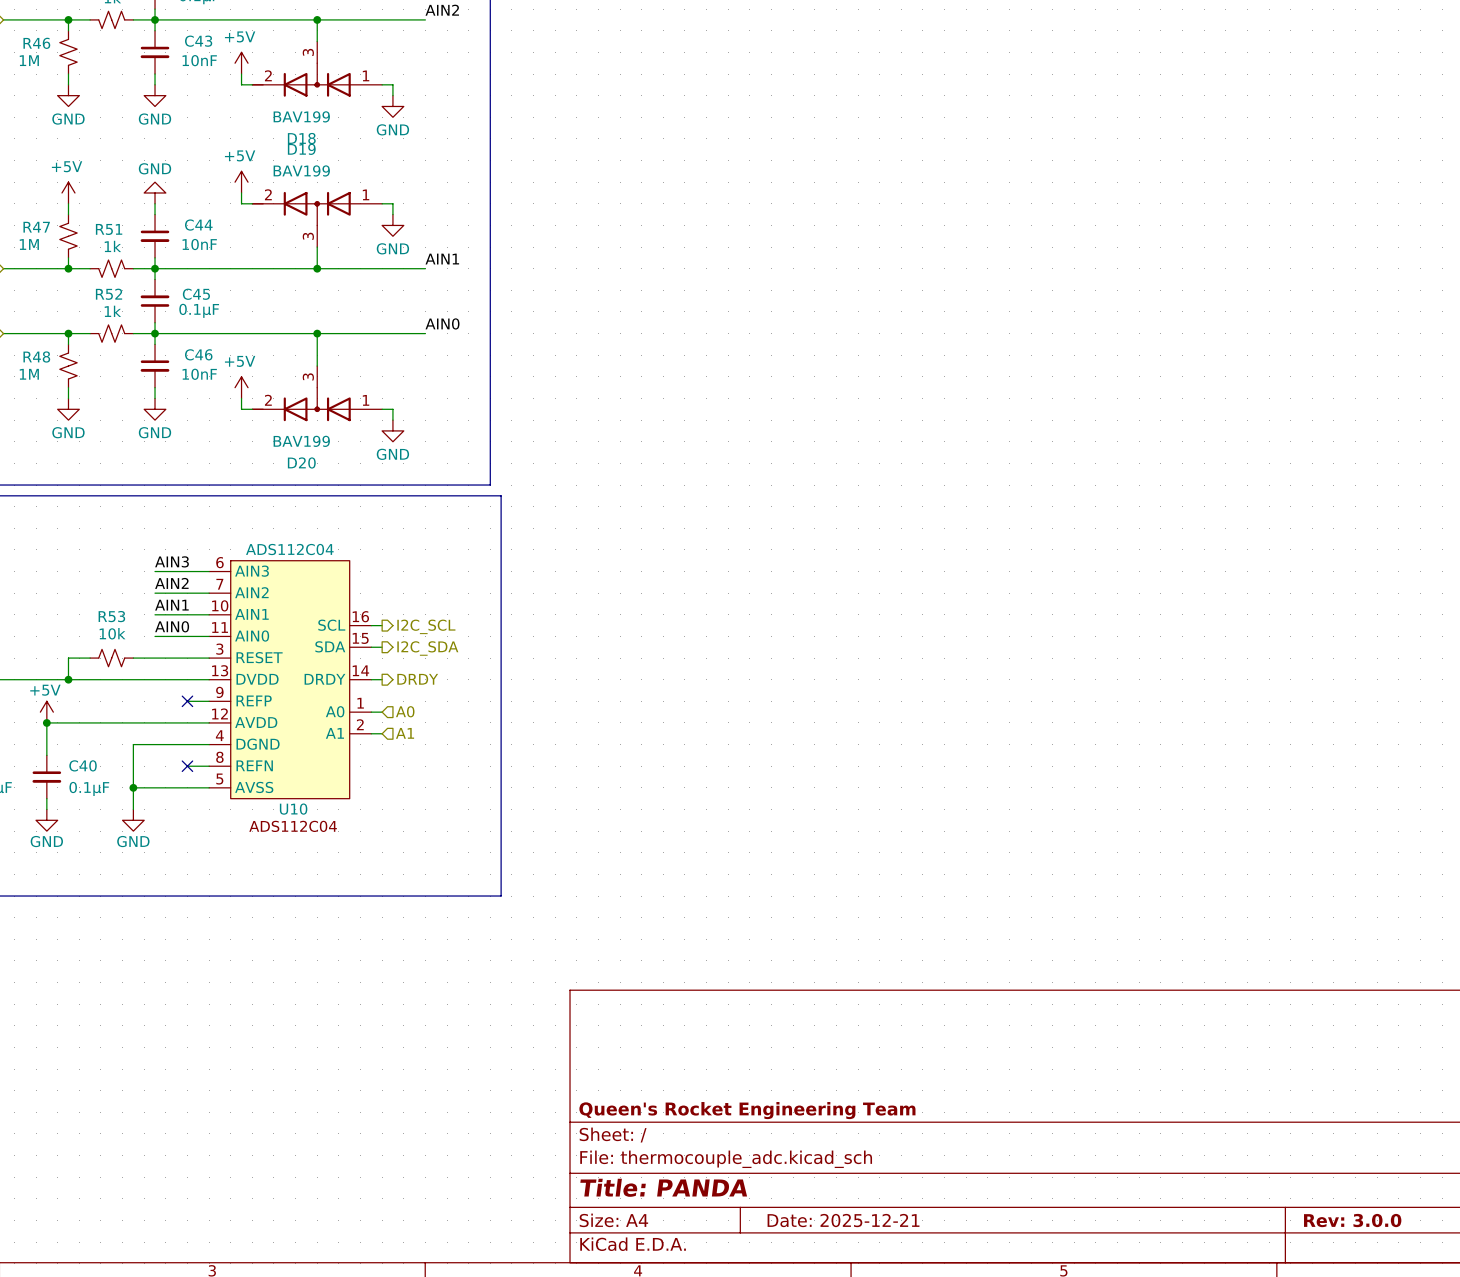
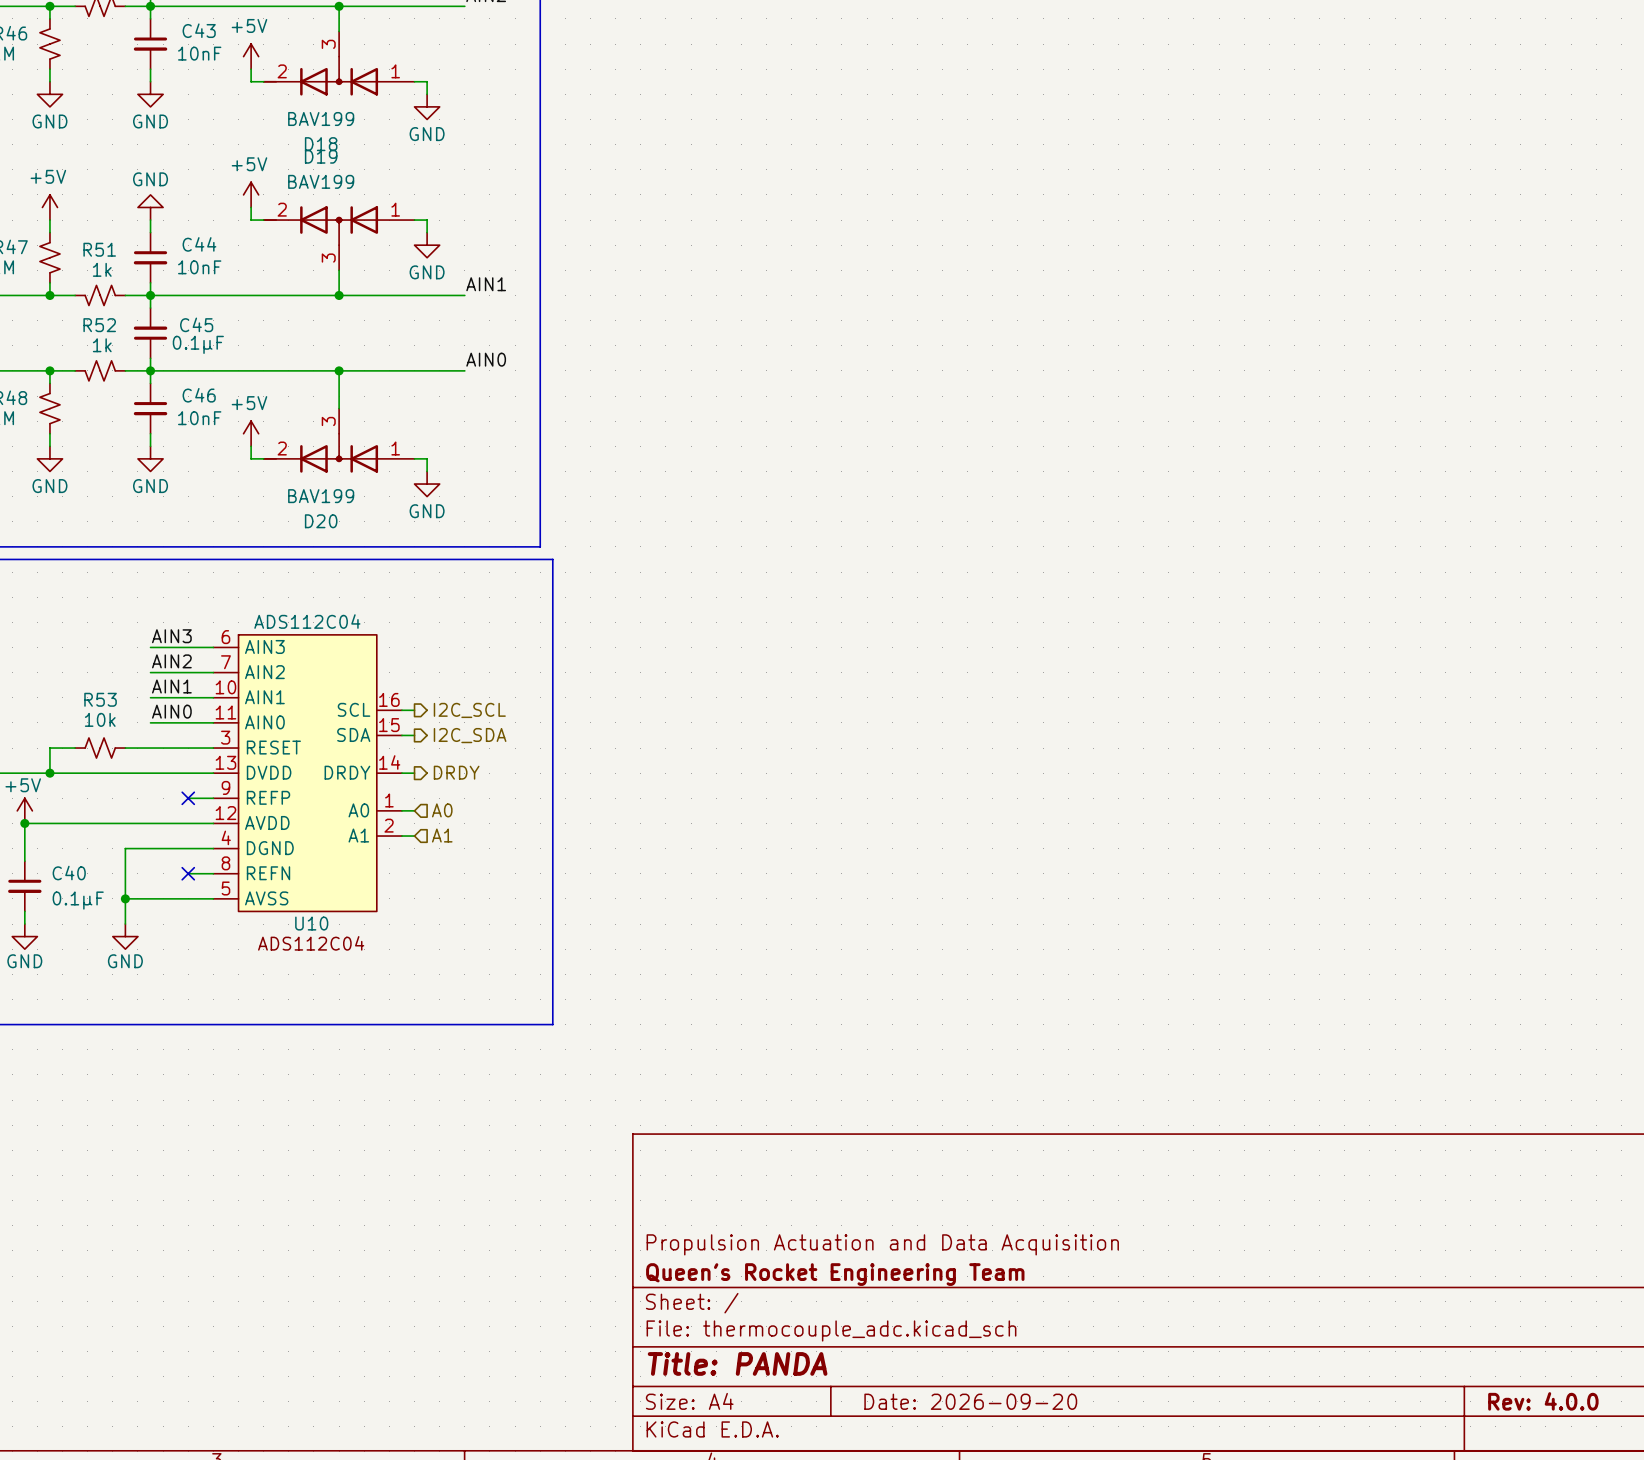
title block: none -> Propulsion Actuation and Data Acquisition (882, 1244)
title block: Date: 2025-12-21 (843, 1220) -> Date: 2026-09-20 (970, 1401)
title block: Rev: 3.0.0 (1352, 1220) -> Rev: 4.0.0 (1543, 1401)

